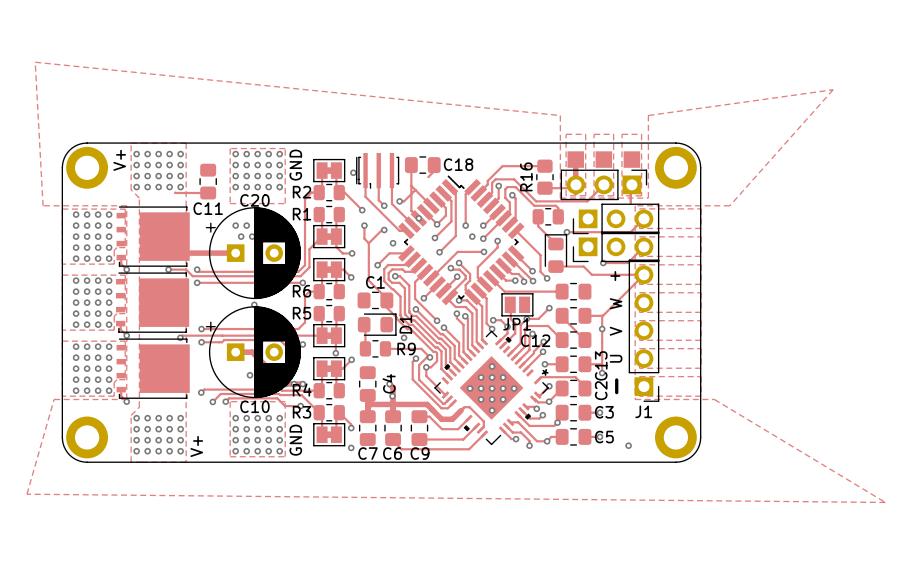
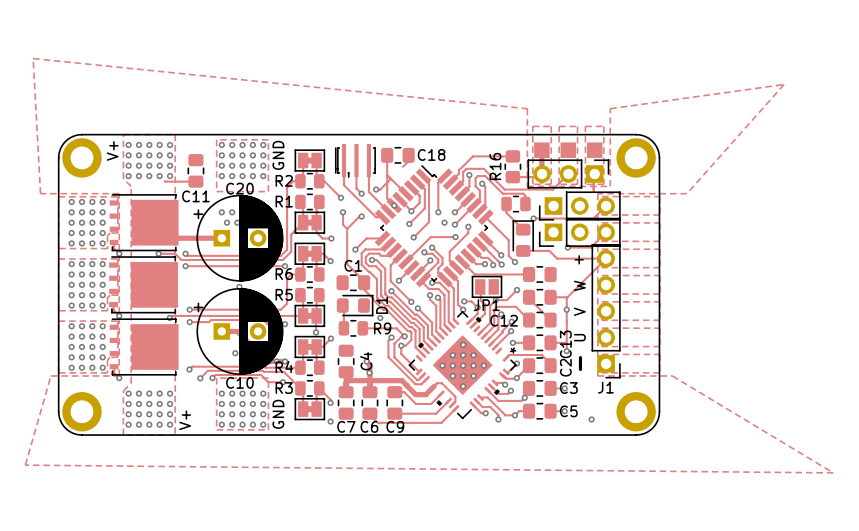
via: (353, 172) -> none
via: (393, 243) -> none

